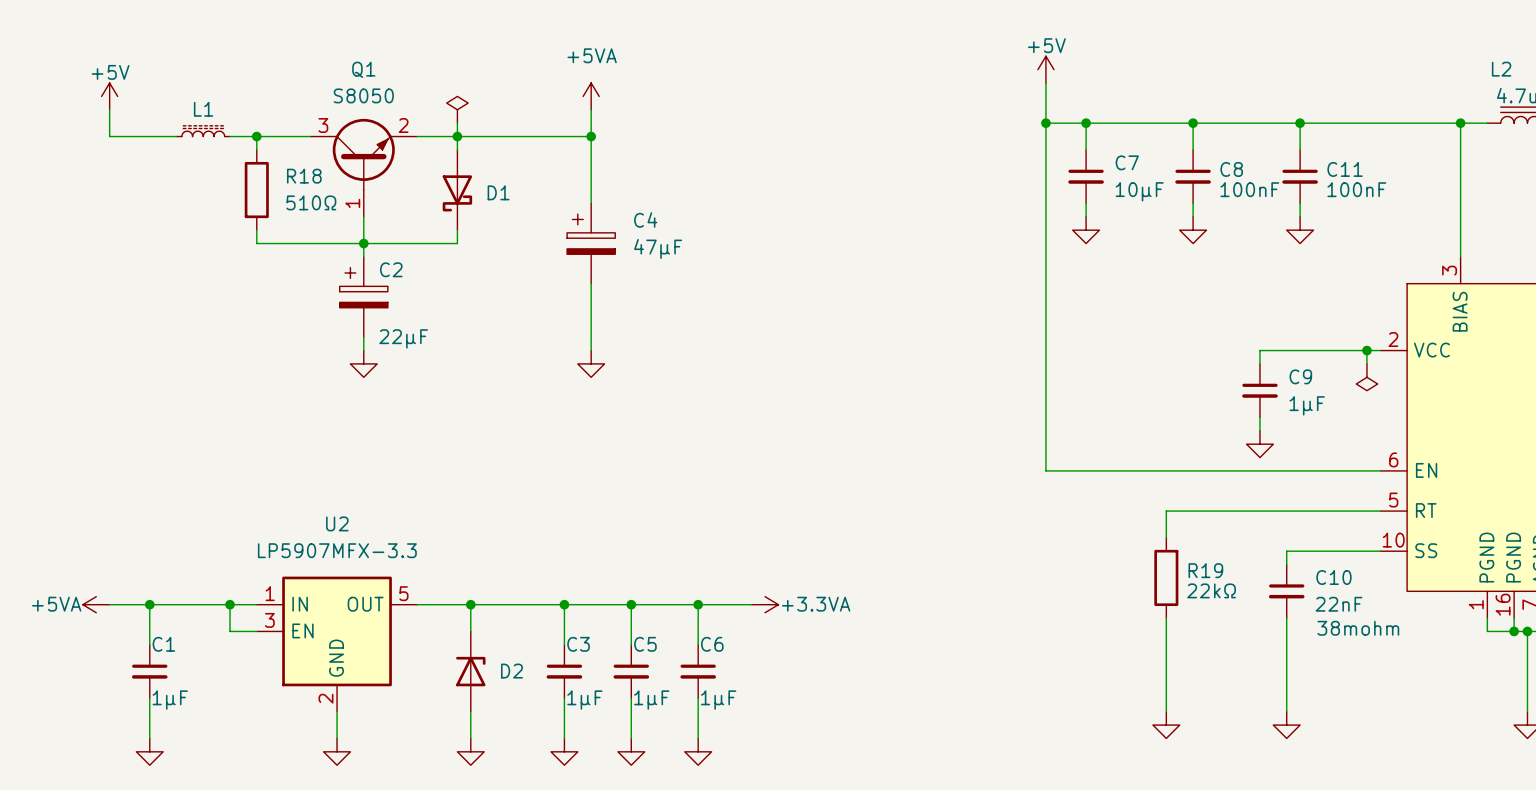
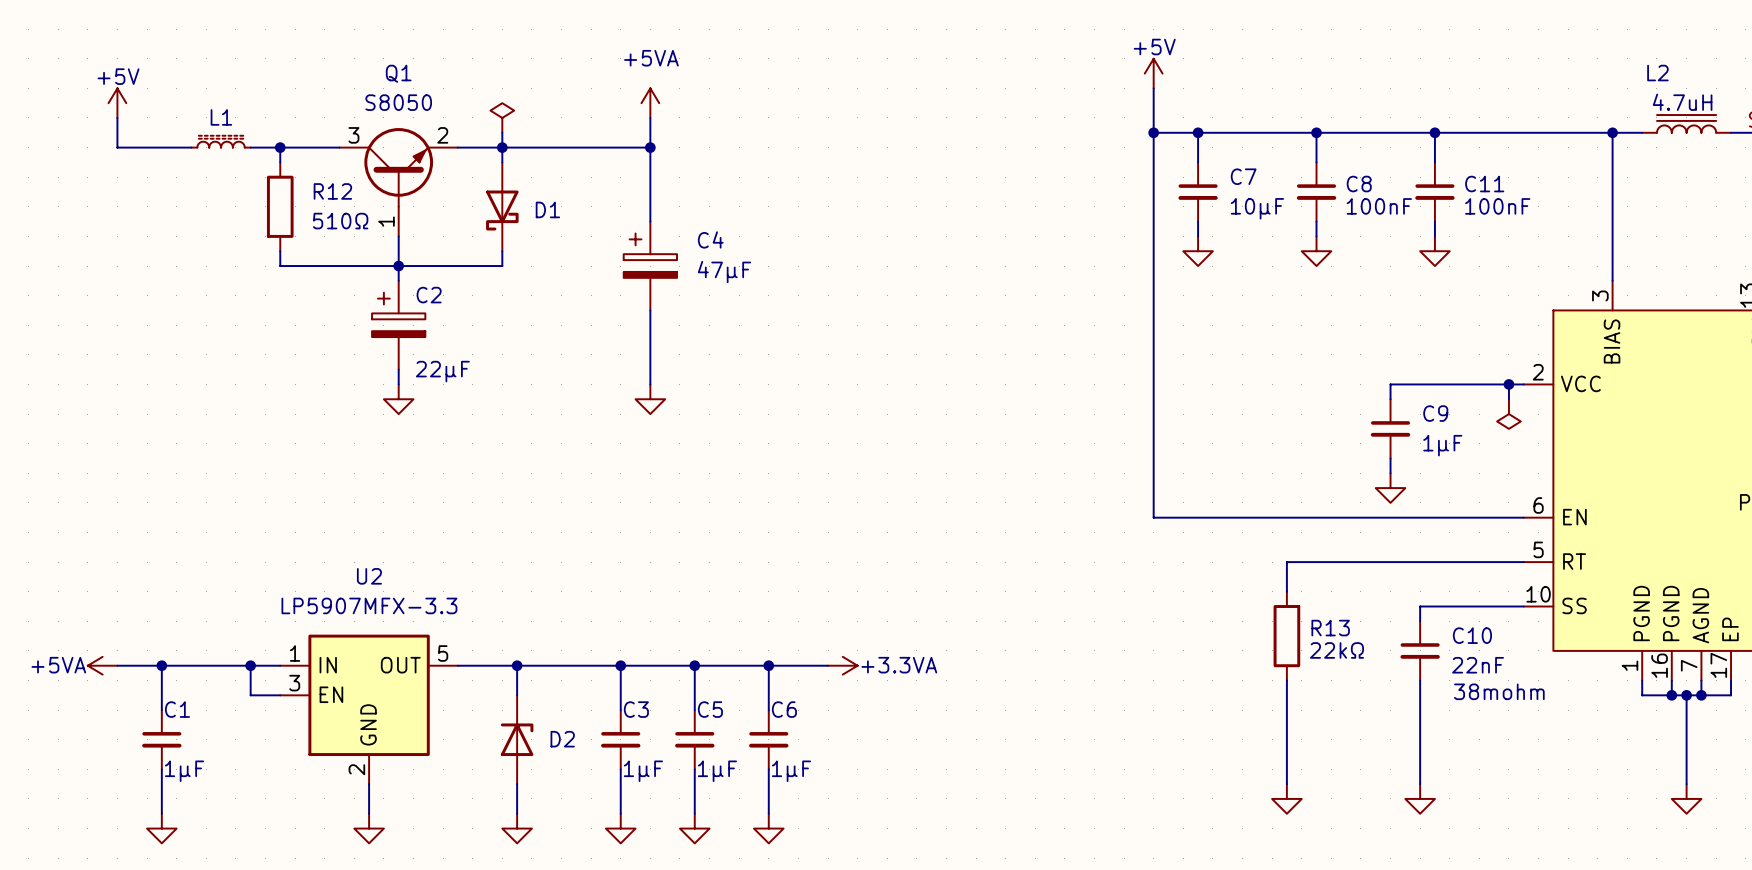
R18 name: R18 (304, 176) -> R12 (332, 191)
R19 name: R19 (1205, 570) -> R13 (1330, 628)

